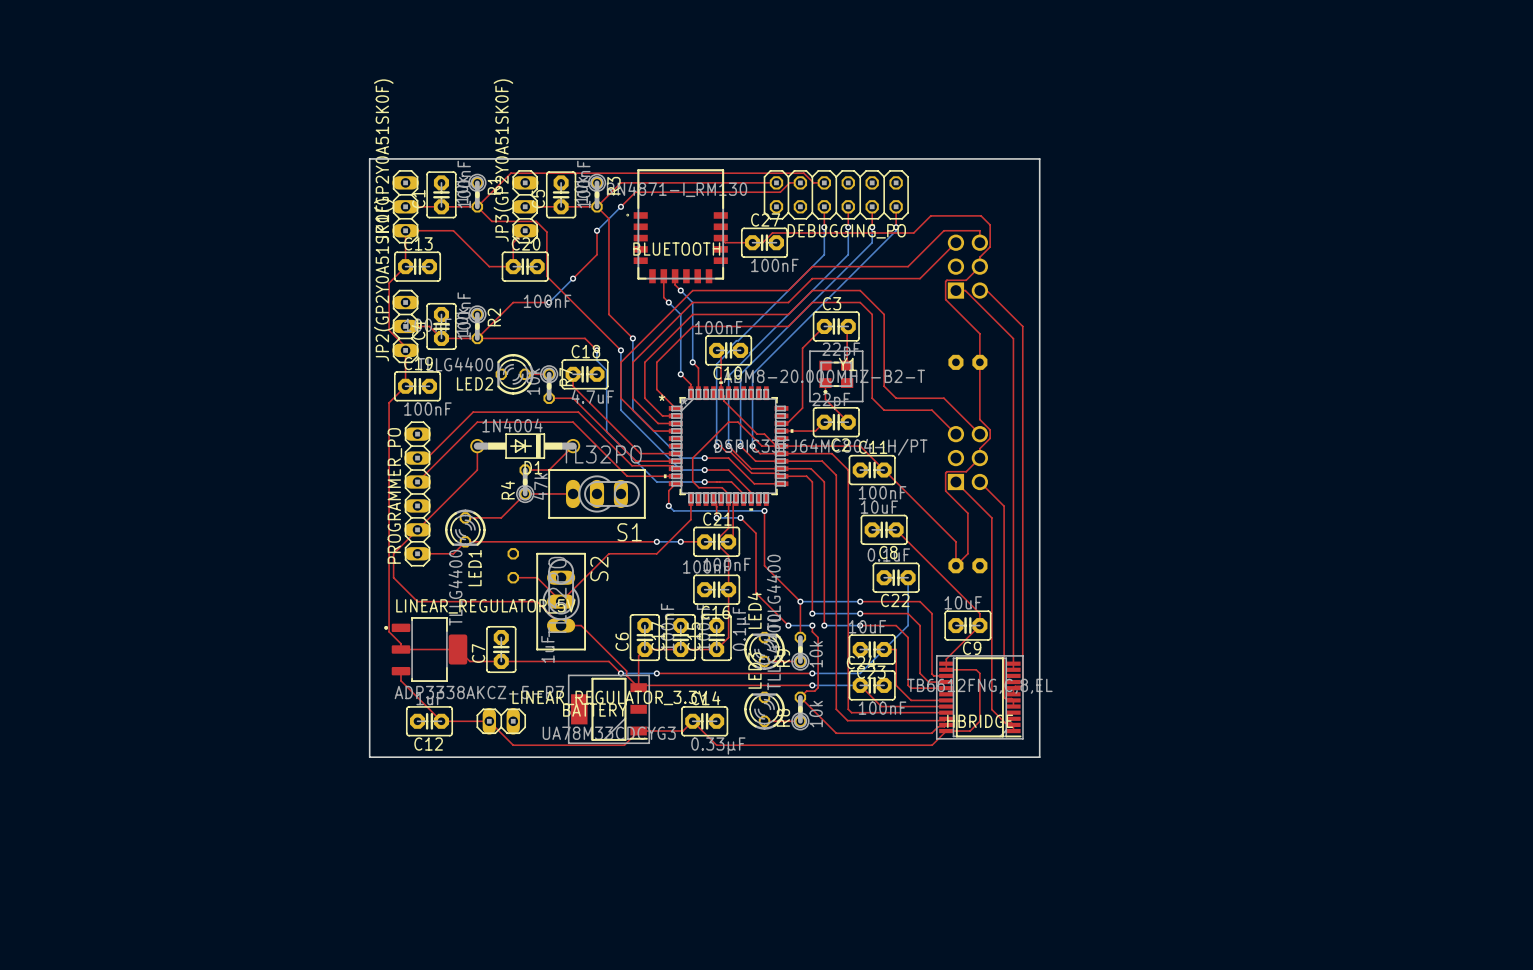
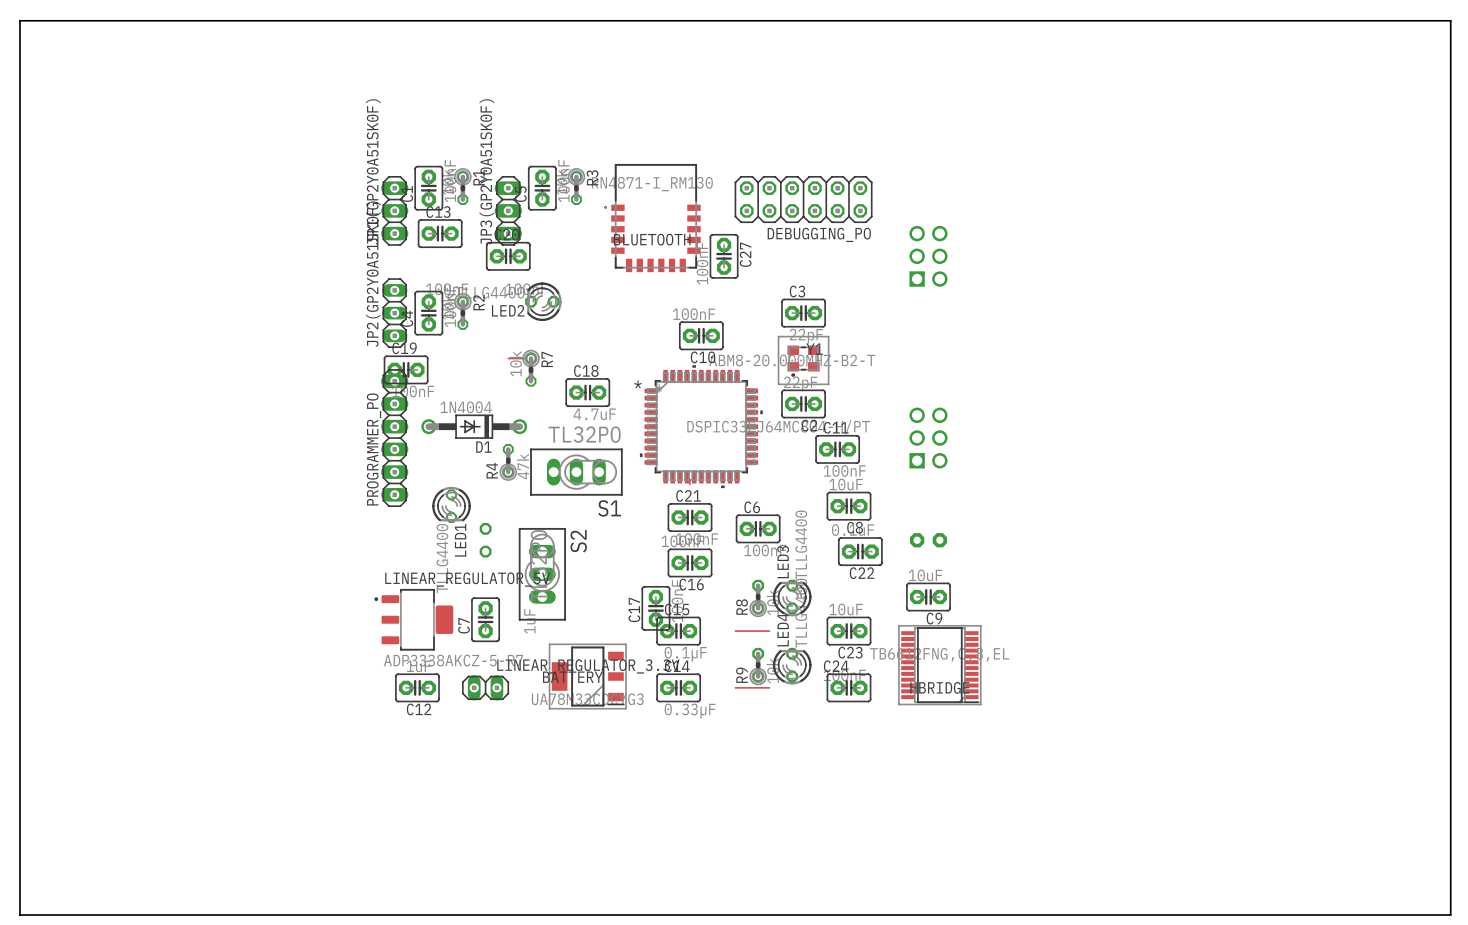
board edge: none -> (19, 20) (1450, 20) (1450, 915) (19, 915) (19, 20)
board edge: (369, 158) (369, 757) (1039, 757) (1039, 158) (369, 158) -> none
JP1(GP2Y0A51SK0F) footprint: [392, 170, 419, 244] -> [381, 176, 409, 246]
JP3(GP2Y0A51SK0F) footprint: [511, 170, 539, 244] -> [494, 176, 522, 246]
top track: (776, 182) (620, 182) (597, 206) -> none
top track: (800, 182) (789, 182) (780, 192) (635, 192) (620, 206) -> none
top track: (824, 182) (813, 182) (803, 173) (510, 173) (477, 206) -> none
DEBUGGING_PO: (836, 194) -> none
top track: (405, 206) (477, 206) -> none
top track: (477, 206) (491, 221) (536, 221) (546, 232) (546, 276) (620, 350) -> none
top track: (525, 206) (597, 206) -> none
top track: (597, 206) (608, 218) (608, 314) (632, 338) -> none
bottom track: (620, 206) (597, 230) -> none
via: (620, 206) -> none
top track: (824, 206) (824, 227) -> none
DEBUGGING_PO: none -> (803, 199)
top track: (848, 206) (848, 227) -> none
top track: (872, 206) (872, 227) -> none
top track: (896, 206) (896, 227) -> none
bottom track: (824, 227) (824, 254) (730, 346) (730, 349) (716, 364) (716, 446) -> none
via: (824, 227) -> none
bottom track: (848, 227) (848, 254) (728, 376) (728, 446) -> none
via: (848, 227) -> none
bottom track: (872, 227) (872, 242) (740, 374) (740, 446) -> none
via: (872, 227) -> none
bottom track: (896, 227) (896, 230) (752, 374) (752, 446) -> none
via: (896, 227) -> none
top track: (525, 230) (513, 242) (513, 266) (489, 266) (453, 230) (405, 230) (405, 266) (389, 283) (389, 330) (405, 346) (405, 386) (389, 402) (389, 631) (401, 643) (401, 649) (458, 649) (469, 661) (608, 661) (620, 673) -> none
top track: (597, 230) (597, 254) (573, 278) -> none
via: (597, 230) -> none
top track: (720, 238) (725, 242) (762, 242) (772, 233) (913, 233) (930, 215) (981, 215) (990, 224) (990, 246) (979, 257) (979, 266) (966, 280) (945, 281) (945, 299) (979, 333) (979, 419) (990, 429) (990, 438) (979, 448) (979, 458) (966, 471) (945, 472) (945, 491) (967, 513) (967, 553) (955, 565) (955, 541) (860, 446) (762, 446) (738, 422) (728, 422) (692, 458) (692, 481) (698, 487) (722, 487) (728, 494) (728, 528) (718, 537) (718, 545) (728, 555) (728, 637) (716, 649) (644, 649) (638, 655) (638, 687) -> none
C27 rotation: 0° (764, 242) -> 90° clockwise (724, 256)
top track: (955, 242) (920, 278) (812, 278) (788, 302) (692, 302) (632, 362) (632, 398) (658, 423) (675, 423) -> none
top track: (979, 242) (979, 230) (943, 230) (908, 266) (812, 266) (788, 290) (692, 290) (620, 362) (620, 398) (653, 431) (675, 431) -> none
C13 position: (417, 266) -> (440, 233)
top track: (663, 276) (663, 297) (668, 302) -> none
top track: (675, 276) (675, 284) (680, 290) -> none
bottom track: (573, 278) (549, 302) -> none
via: (573, 278) -> none
bottom track: (680, 290) (692, 302) (692, 362) -> none
via: (680, 290) -> none
top track: (955, 290) (965, 290) (1013, 338) (1013, 669) -> none
top track: (979, 290) (986, 290) (1022, 326) (1022, 685) (1015, 686) (1013, 694) -> none
top track: (549, 302) (513, 302) (477, 338) -> none
via: (549, 302) -> none
bottom track: (668, 302) (680, 314) (680, 374) -> none
via: (668, 302) -> none
top track: (405, 326) (429, 326) (441, 338) (585, 338) (597, 350) -> none
top track: (824, 326) (802, 348) (802, 408) (787, 423) (781, 423) -> none
top track: (848, 326) (847, 365) -> none
bottom track: (632, 338) (632, 410) (680, 458) (704, 458) -> none
via: (632, 338) -> none
bottom track: (597, 350) (597, 360) (606, 370) (606, 431) (656, 482) (704, 482) -> none
via: (597, 350) -> none
bottom track: (620, 350) (620, 410) (680, 470) (704, 470) -> none
via: (620, 350) -> none
top track: (716, 350) (721, 354) (721, 393) (724, 396) (724, 401) (757, 434) (764, 434) (776, 446) -> none
LED2 footprint: [495, 353, 534, 395] -> [525, 282, 562, 322]
top track: (692, 362) (698, 368) (698, 393) -> none
via: (692, 362) -> none
part: (967, 362) -> none
top track: (573, 374) (573, 386) (640, 453) (675, 453) -> none
C18 position: (585, 374) -> (587, 392)
top track: (680, 374) (690, 384) (690, 393) -> none
via: (680, 374) -> none
top track: (825, 383) (825, 399) (848, 422) -> none
top track: (549, 398) (573, 398) (636, 461) (675, 461) -> none
top track: (675, 408) (656, 389) (656, 362) (692, 326) (788, 326) (812, 302) (860, 302) (872, 314) (872, 398) (884, 410) (932, 410) (955, 434) -> none
top track: (675, 415) (662, 415) (644, 398) (644, 362) (692, 314) (788, 314) (812, 290) (860, 290) (884, 314) (884, 386) (896, 398) (943, 398) (979, 434) -> none
top track: (824, 422) (815, 431) (781, 431) -> none
D1 footprint: [470, 433, 581, 459] -> [421, 414, 528, 439]
top track: (477, 446) (477, 470) (393, 553) (393, 577) (417, 601) (537, 601) (561, 625) (581, 625) (626, 671) (626, 675) (638, 687) -> none
top track: (573, 446) (549, 470) (525, 470) -> none
top track: (716, 446) (720, 446) (726, 451) (730, 451) (751, 473) (806, 476) (812, 482) (812, 613) -> none
via: (716, 446) -> none
top track: (728, 446) (751, 468) (811, 468) (824, 482) (824, 625) -> none
via: (728, 446) -> none
top track: (740, 446) (755, 461) (822, 461) (836, 475) (836, 709) (847, 720) (944, 720) (946, 718) -> none
via: (740, 446) -> none
top track: (752, 446) (760, 453) (831, 453) (848, 470) (848, 709) (851, 712) (946, 712) -> none
via: (752, 446) -> none
PROGRAMMER_PO: none -> (394, 438)
top track: (417, 458) (427, 458) (473, 412) (578, 412) (632, 465) (672, 465) (675, 468) -> none
top track: (704, 458) (728, 458) (754, 483) (781, 483) -> none
via: (704, 458) -> none
top track: (704, 470) (728, 470) (752, 493) (751, 498) -> none
via: (704, 470) -> none
top track: (675, 476) (627, 476) (573, 422) (477, 422) (417, 482) -> none
top track: (704, 482) (731, 482) (743, 494) (743, 498) -> none
via: (704, 482) -> none
top track: (955, 482) (991, 517) (991, 709) (1005, 723) (1011, 723) (1013, 731) -> none
top track: (979, 482) (1004, 506) (1004, 697) (1011, 698) (1013, 706) -> none
top track: (675, 483) (668, 490) (668, 505) -> none
PROGRAMMER_PO: (417, 493) -> none
top track: (573, 493) (525, 493) (501, 517) (465, 517) -> none
top track: (690, 498) (690, 519) (656, 553) (608, 553) (561, 601) (537, 577) (513, 577) -> none
top track: (736, 498) (733, 501) (733, 537) (728, 541) -> none
bottom track: (668, 505) (673, 510) (764, 510) -> none
via: (668, 505) -> none
top track: (716, 506) (716, 517) -> none
top track: (764, 510) (764, 565) (800, 601) (800, 637) -> none
via: (764, 510) -> none
bottom track: (716, 517) (740, 517) -> none
via: (716, 517) -> none
top track: (740, 517) (756, 533) (756, 593) (788, 625) -> none
via: (740, 517) -> none
top track: (896, 529) (979, 613) (979, 625) (946, 659) (946, 669) (976, 669) (979, 673) (979, 721) (970, 731) (946, 731) (932, 745) (716, 745) (692, 721) (683, 730) (638, 730) (624, 745) (513, 745) (489, 721) (441, 721) (401, 680) (401, 671) -> none
top track: (656, 541) (465, 541) (453, 553) (417, 553) -> none
bottom track: (656, 541) (680, 541) -> none
via: (656, 541) -> none
top track: (680, 541) (704, 541) -> none
via: (680, 541) -> none
part: none -> (485, 540)
part: (513, 565) -> none
bottom track: (908, 577) (908, 625) (860, 673) (812, 673) -> none
bottom track: (800, 601) (860, 601) -> none
via: (800, 601) -> none
top track: (860, 601) (920, 601) (932, 613) (932, 674) (933, 675) (946, 675) -> none
via: (860, 601) -> none
bottom track: (812, 613) (860, 613) -> none
via: (812, 613) -> none
top track: (860, 613) (908, 613) (920, 625) (920, 673) (928, 682) (946, 682) -> none
via: (860, 613) -> none
bottom track: (788, 625) (812, 625) -> none
via: (788, 625) -> none
top track: (812, 625) (812, 631) (818, 637) (818, 687) (814, 691) (806, 691) (800, 697) (836, 733) (931, 733) (938, 726) (946, 724) -> none
via: (812, 625) -> none
bottom track: (824, 625) (860, 625) -> none
via: (824, 625) -> none
top track: (860, 625) (896, 625) (908, 637) (908, 685) (910, 688) (946, 688) -> none
via: (860, 625) -> none
LED4 footprint: [744, 631, 785, 670] -> [772, 647, 812, 685]
R9 footprint: [791, 631, 810, 671] -> [749, 647, 767, 686]
C6 rotation: 0° (644, 637) -> 90° clockwise (758, 528)
C6 position: (644, 637) -> (758, 528)
C15 rotation: 0° (716, 637) -> 90° clockwise (678, 631)
C23 position: (872, 649) -> (848, 631)
top track: (884, 649) (896, 649) (896, 685) (911, 700) (946, 700) -> none
bottom track: (620, 673) (656, 673) -> none
via: (620, 673) -> none
top track: (656, 673) (812, 673) -> none
via: (656, 673) -> none
via: (812, 673) -> none
top track: (812, 685) (640, 685) (638, 687) -> none
bottom track: (812, 685) (860, 685) -> none
via: (812, 685) -> none
top track: (860, 685) (881, 706) (946, 706) -> none
C24 position: (872, 685) -> (848, 687)
LED3 footprint: [744, 691, 785, 730] -> [772, 579, 812, 617]
R8 footprint: [791, 691, 810, 731] -> [749, 579, 767, 618]

